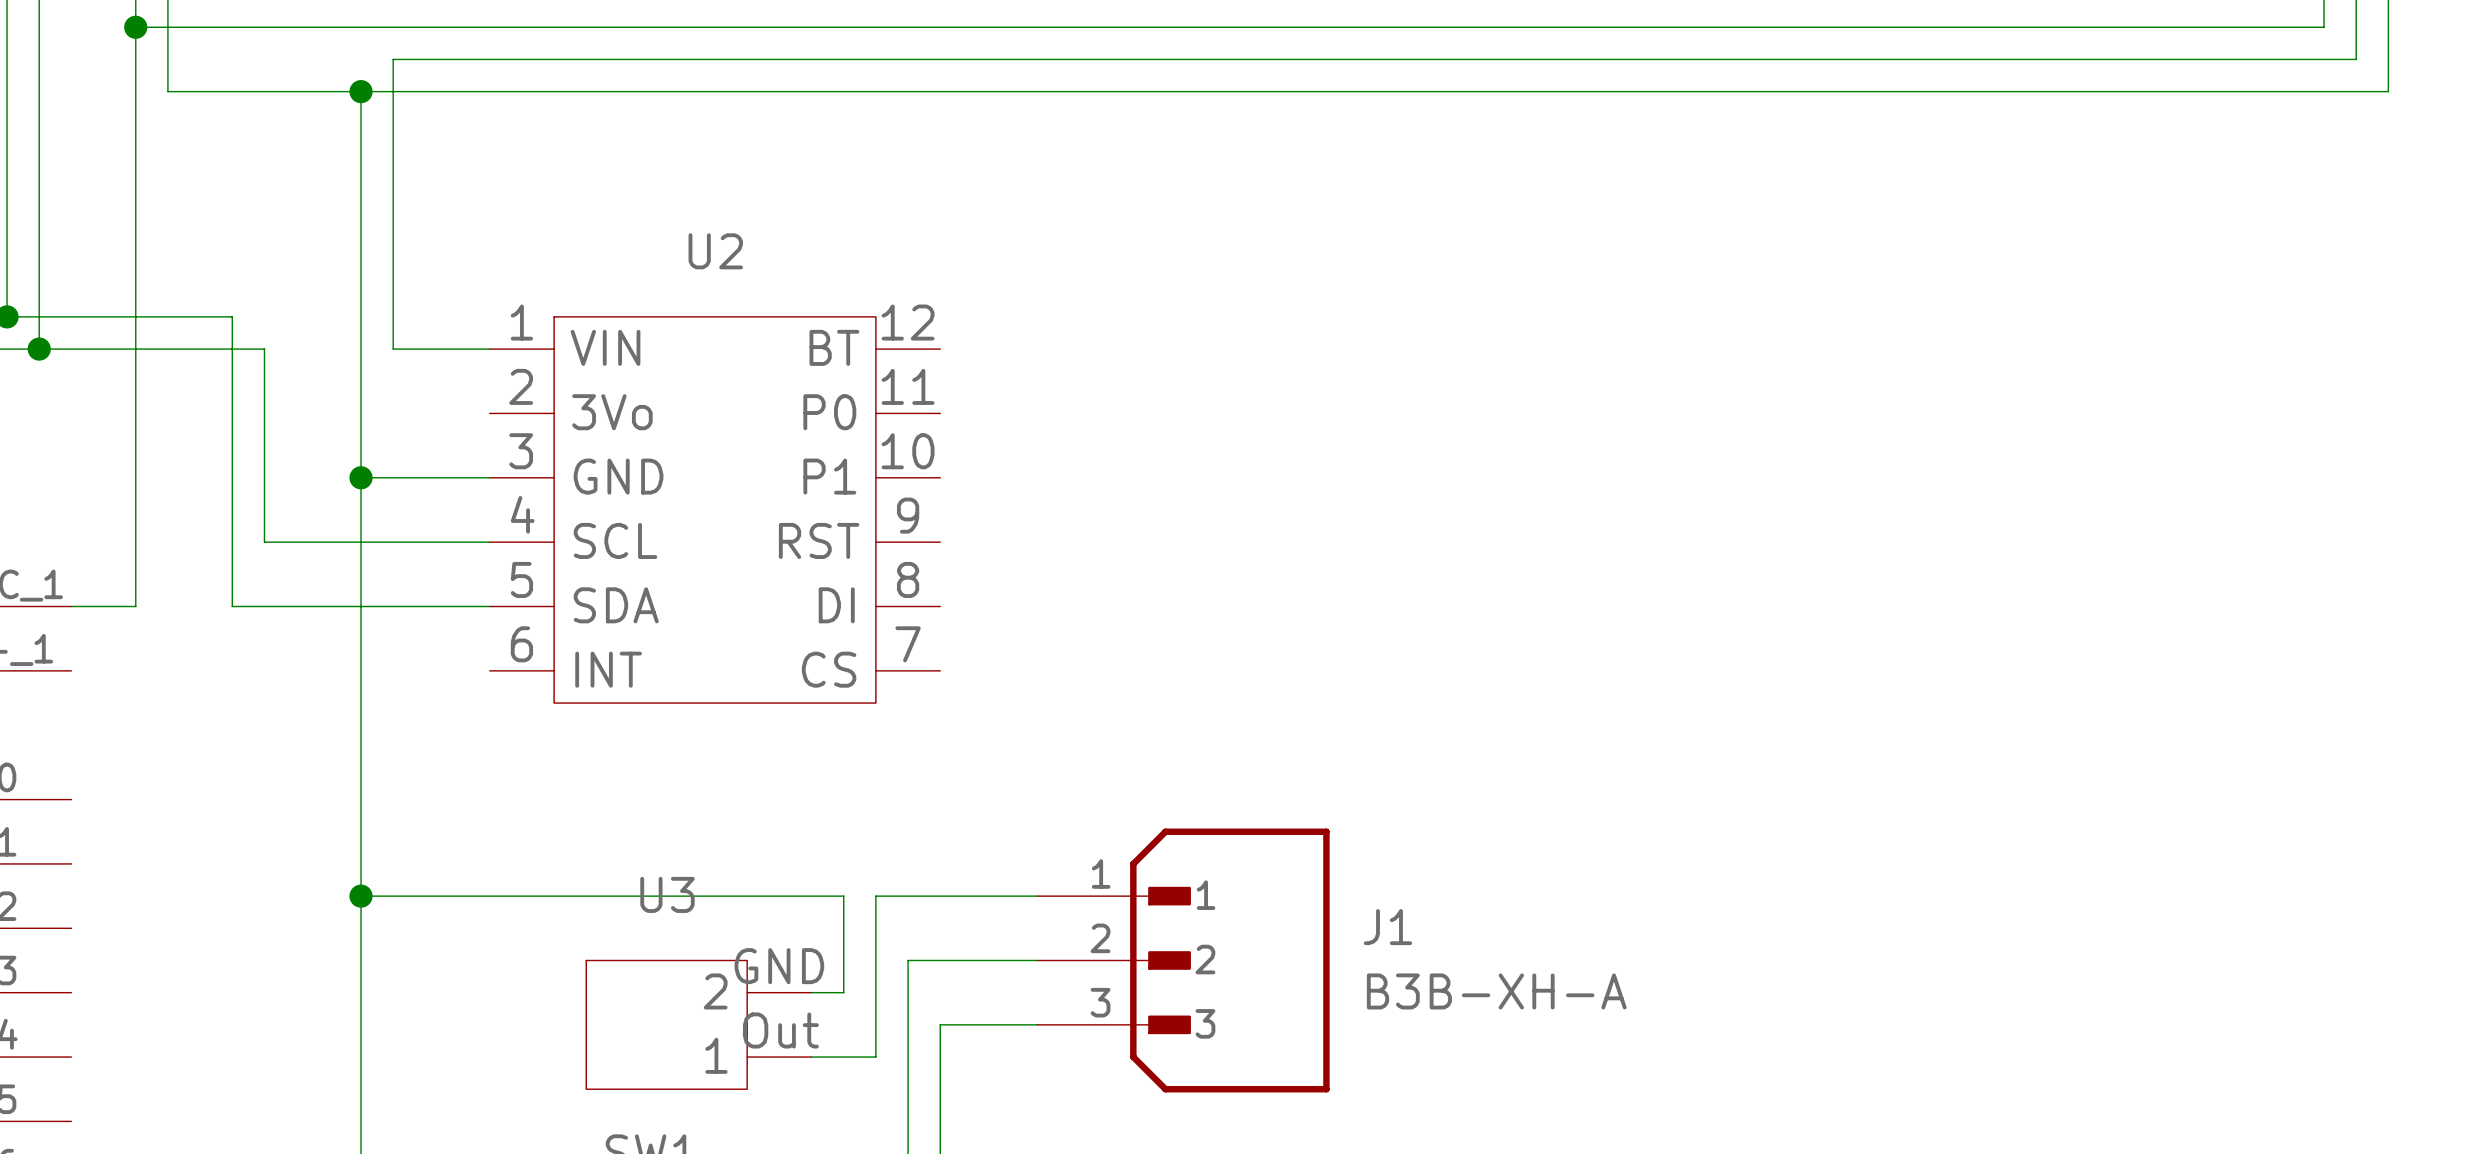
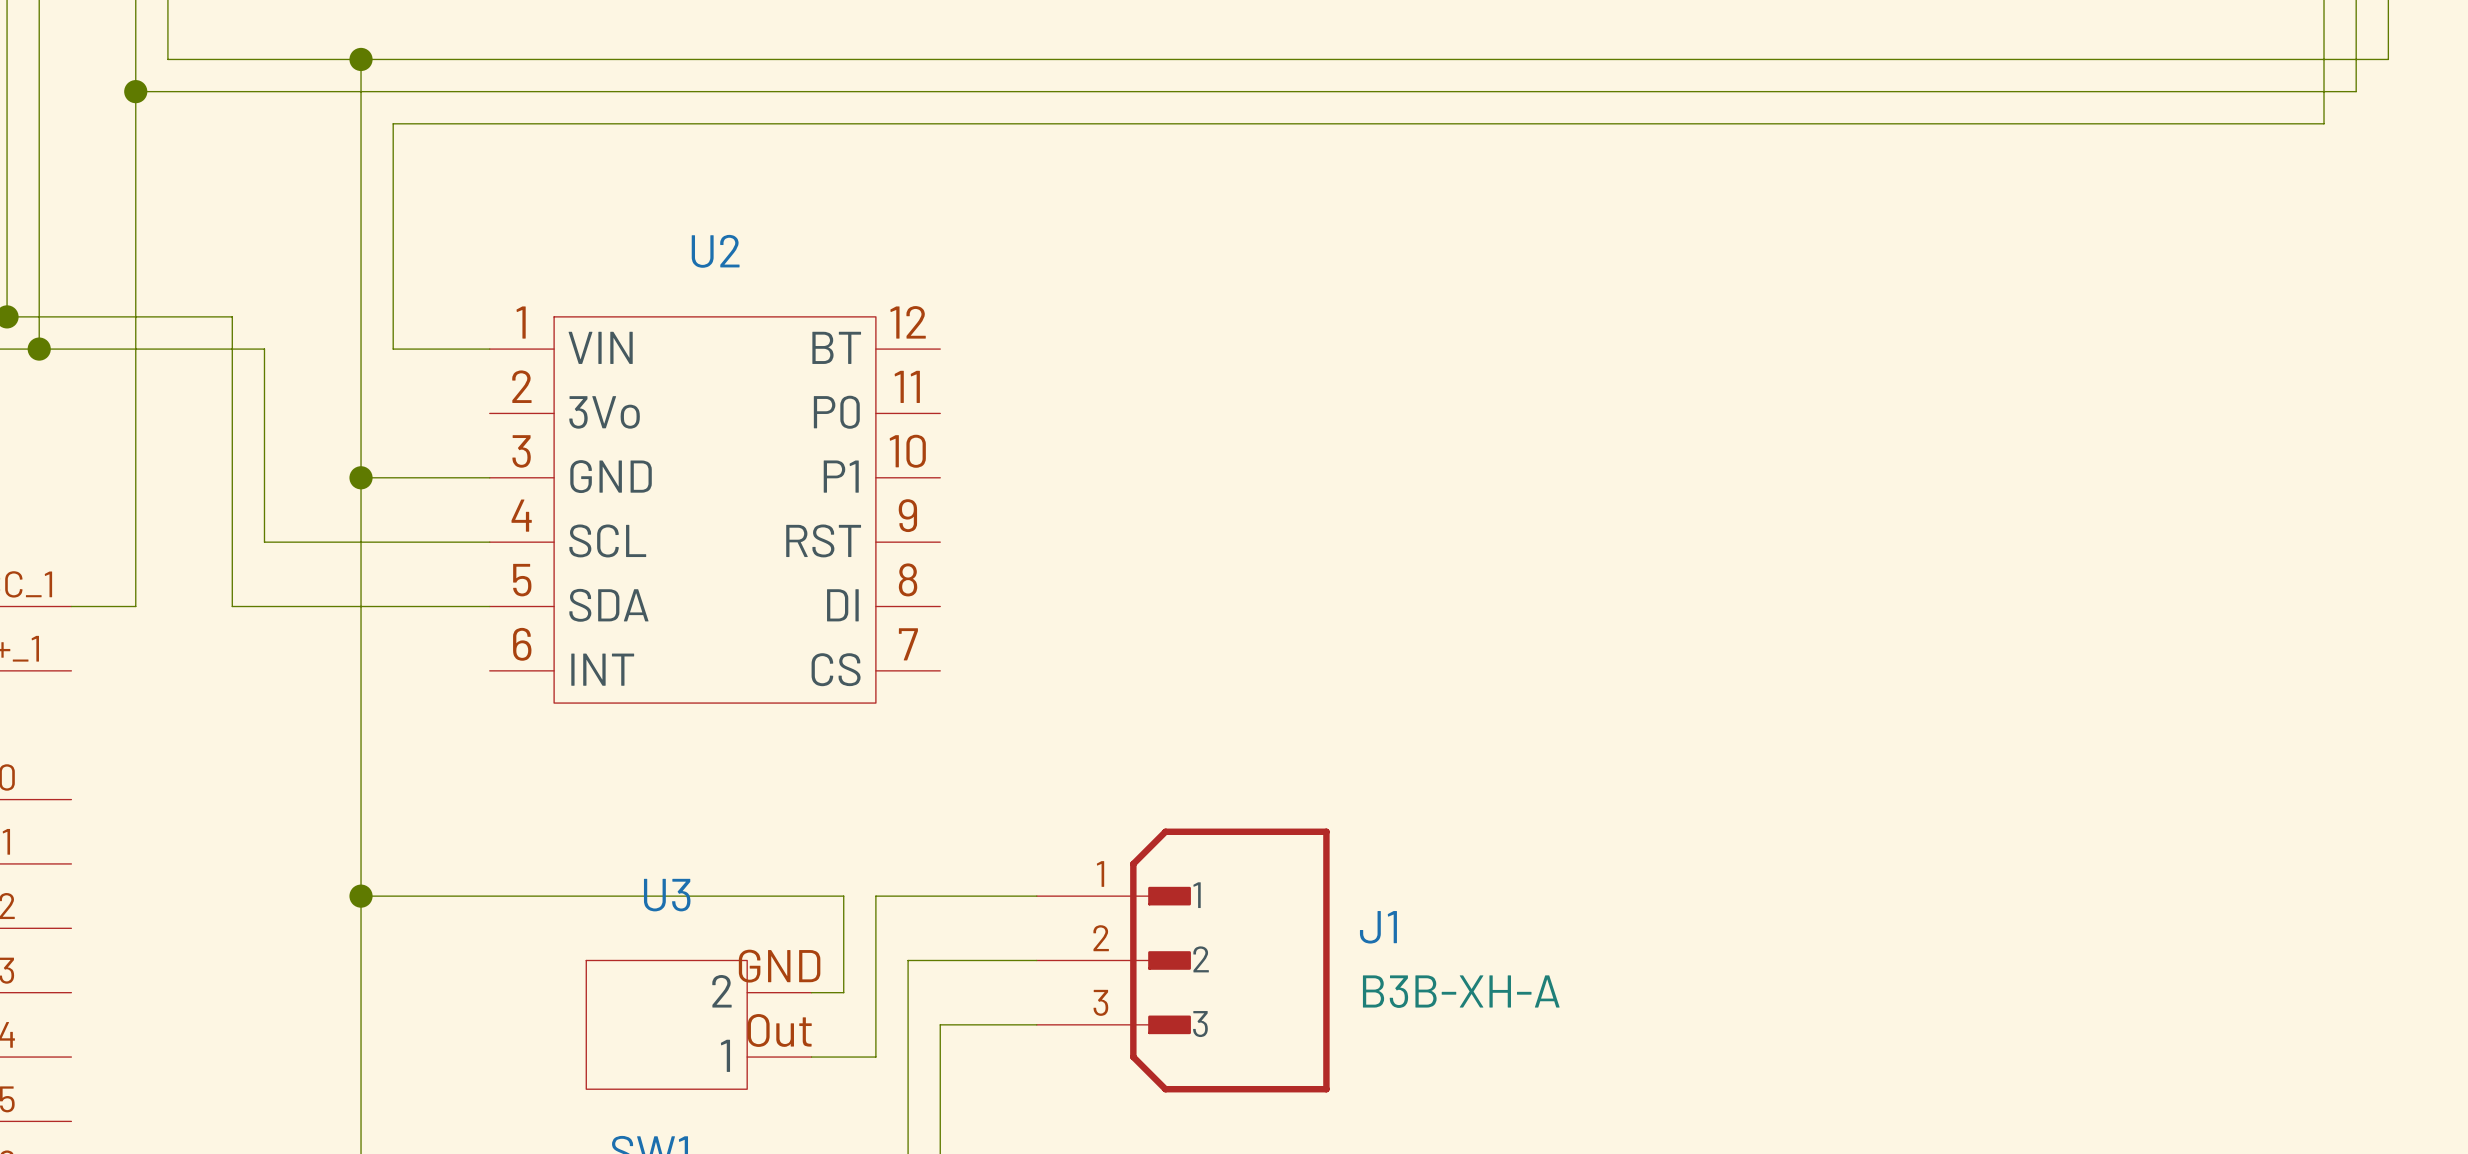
wire: (135, 27) (2324, 27) -> (393, 123) (2324, 123) (2324, 27)
junction position: (135, 27) -> (135, 91)
wire: (167, 59) (167, 91) -> (135, 91) (167, 91)
wire: none -> (361, 59) (361, 91)
wire: (393, 59) (393, 123) -> (393, 59) (167, 59)
wire: (2388, 59) (2388, 91) (2356, 91) -> (2388, 59) (2356, 59) (2356, 91)
junction position: (361, 91) -> (361, 59)

